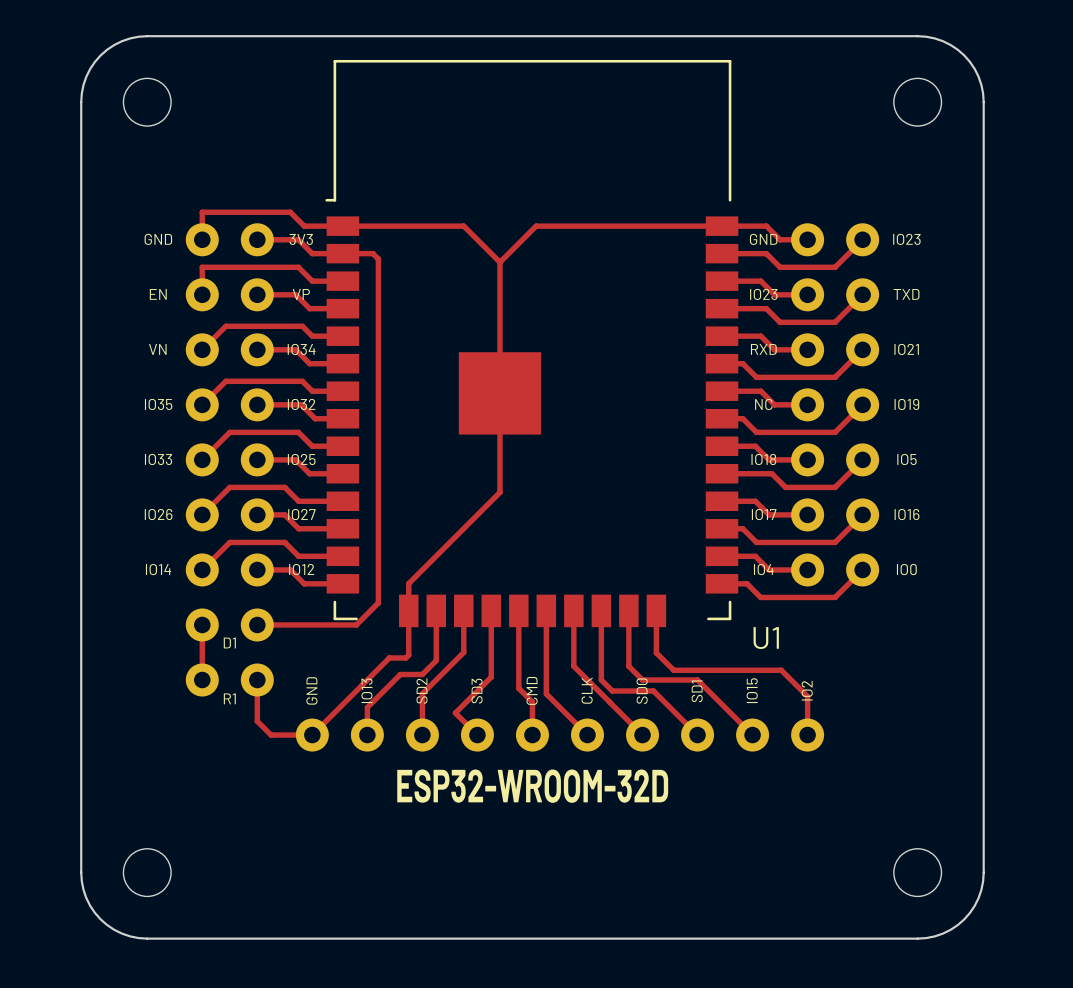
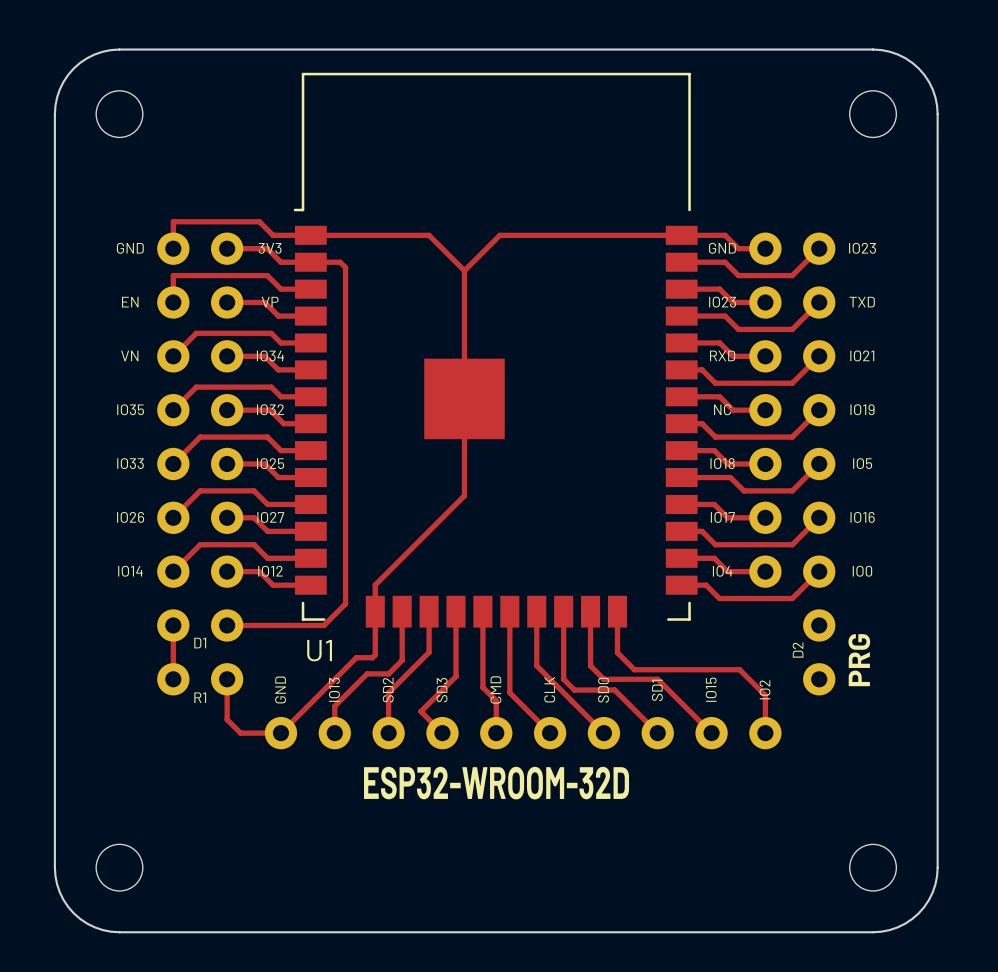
U1 name position: U1 (766, 638) -> U1 (319, 650)
D2: none -> (819, 652)
text: none -> PRG (859, 660)

